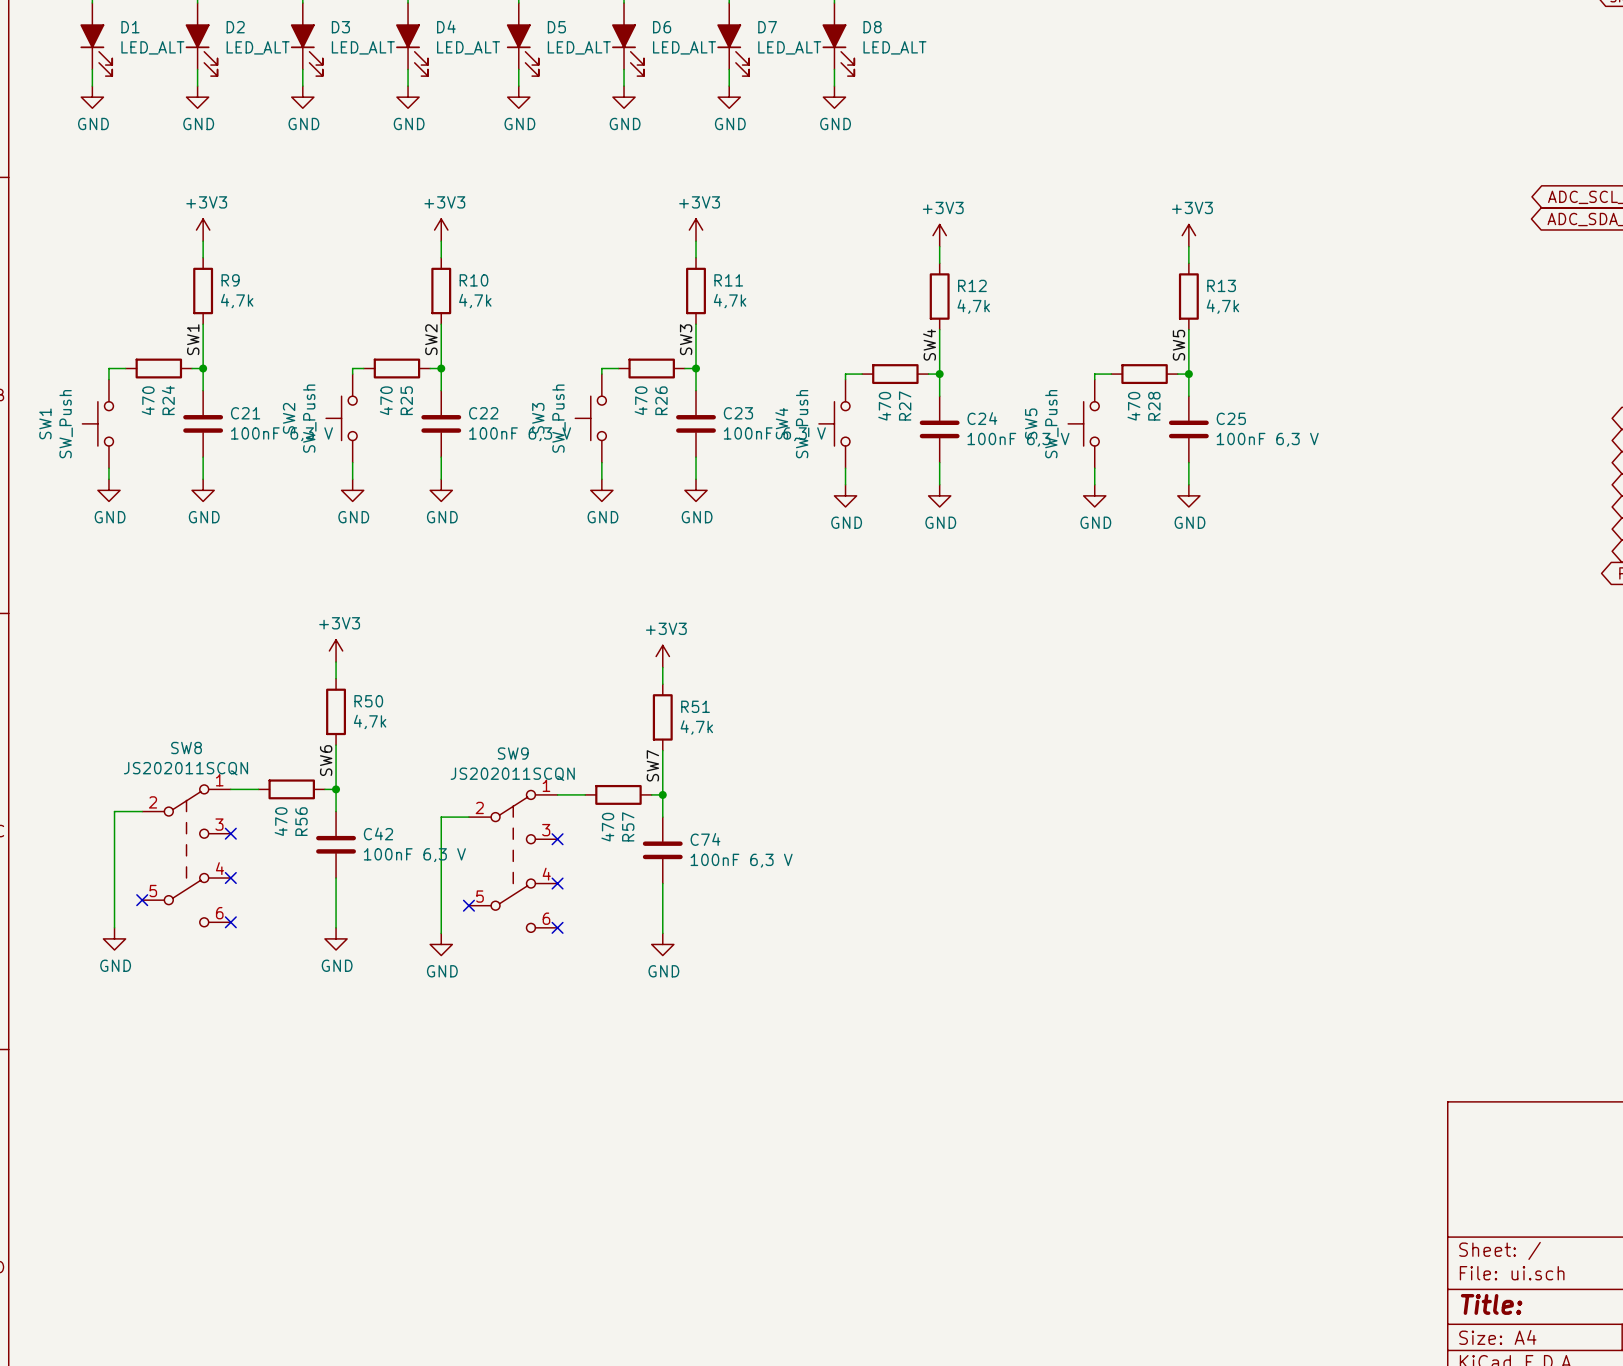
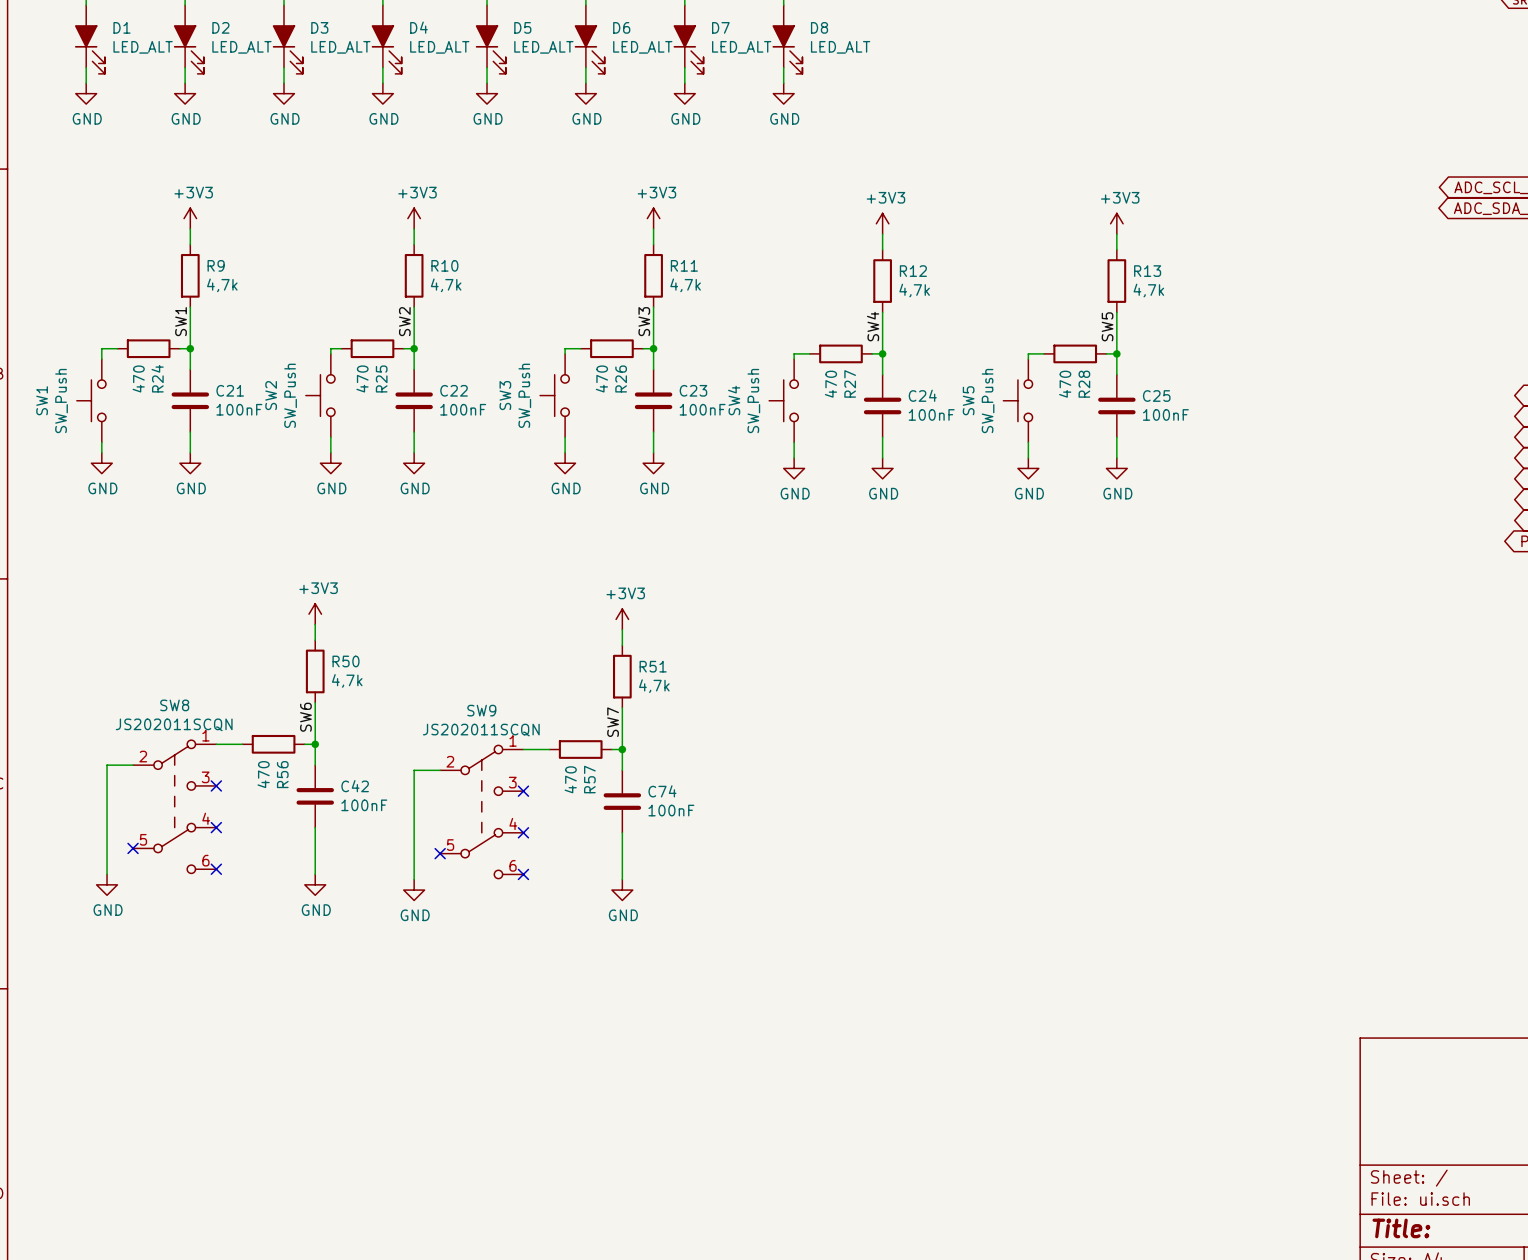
C21 value: 100nF 6,3 V (281, 434) -> 100nF (239, 409)
C22 value: 100nF 6,3 V (520, 434) -> 100nF (463, 409)
C23 value: 100nF 6,3 V (774, 434) -> 100nF (702, 409)
C24 value: 100nF 6,3 V (1018, 439) -> 100nF (931, 414)
C25 value: 100nF 6,3 V (1267, 439) -> 100nF (1165, 414)
C42 value: 100nF 6,3 V (414, 855) -> 100nF (364, 805)
C74 value: 100nF 6,3 V (741, 860) -> 100nF (671, 810)

